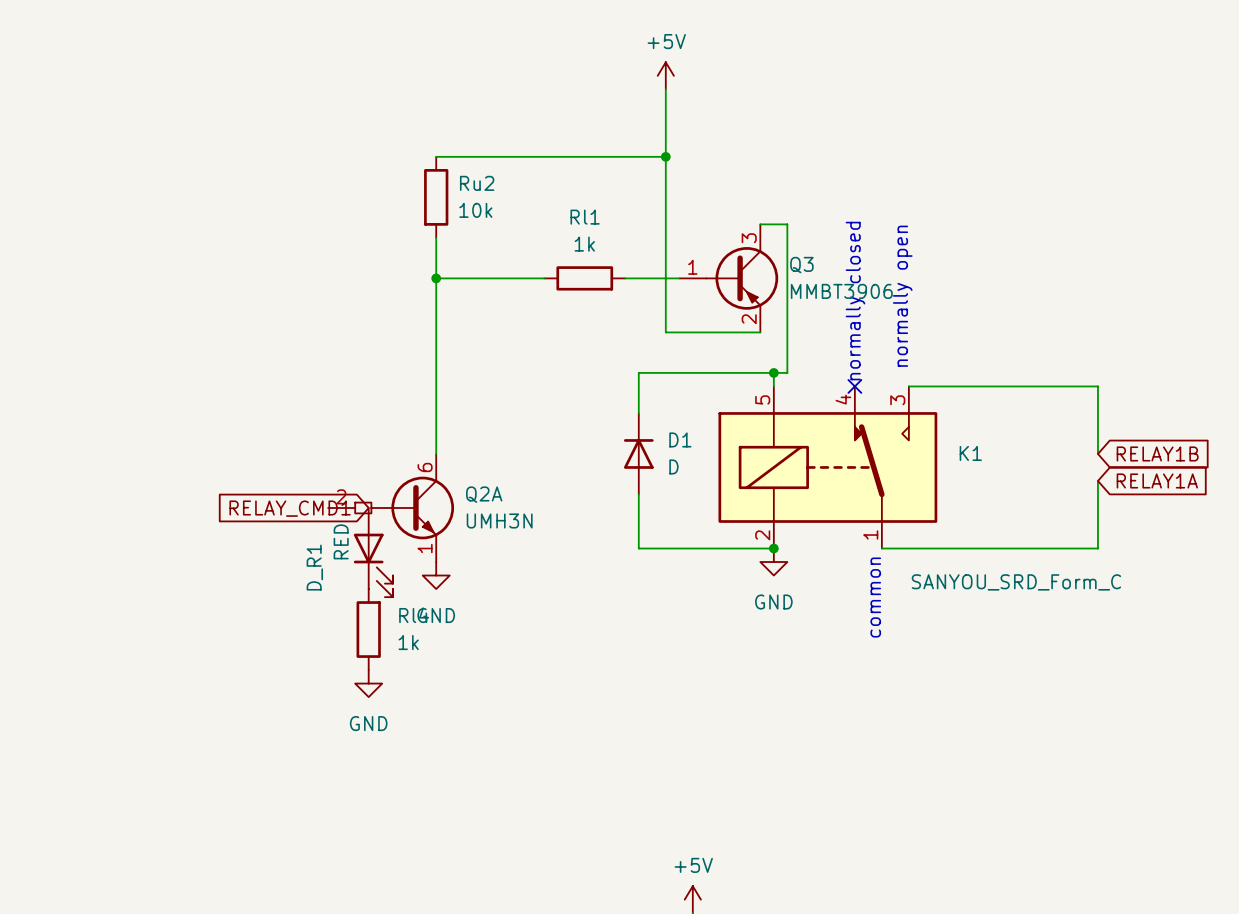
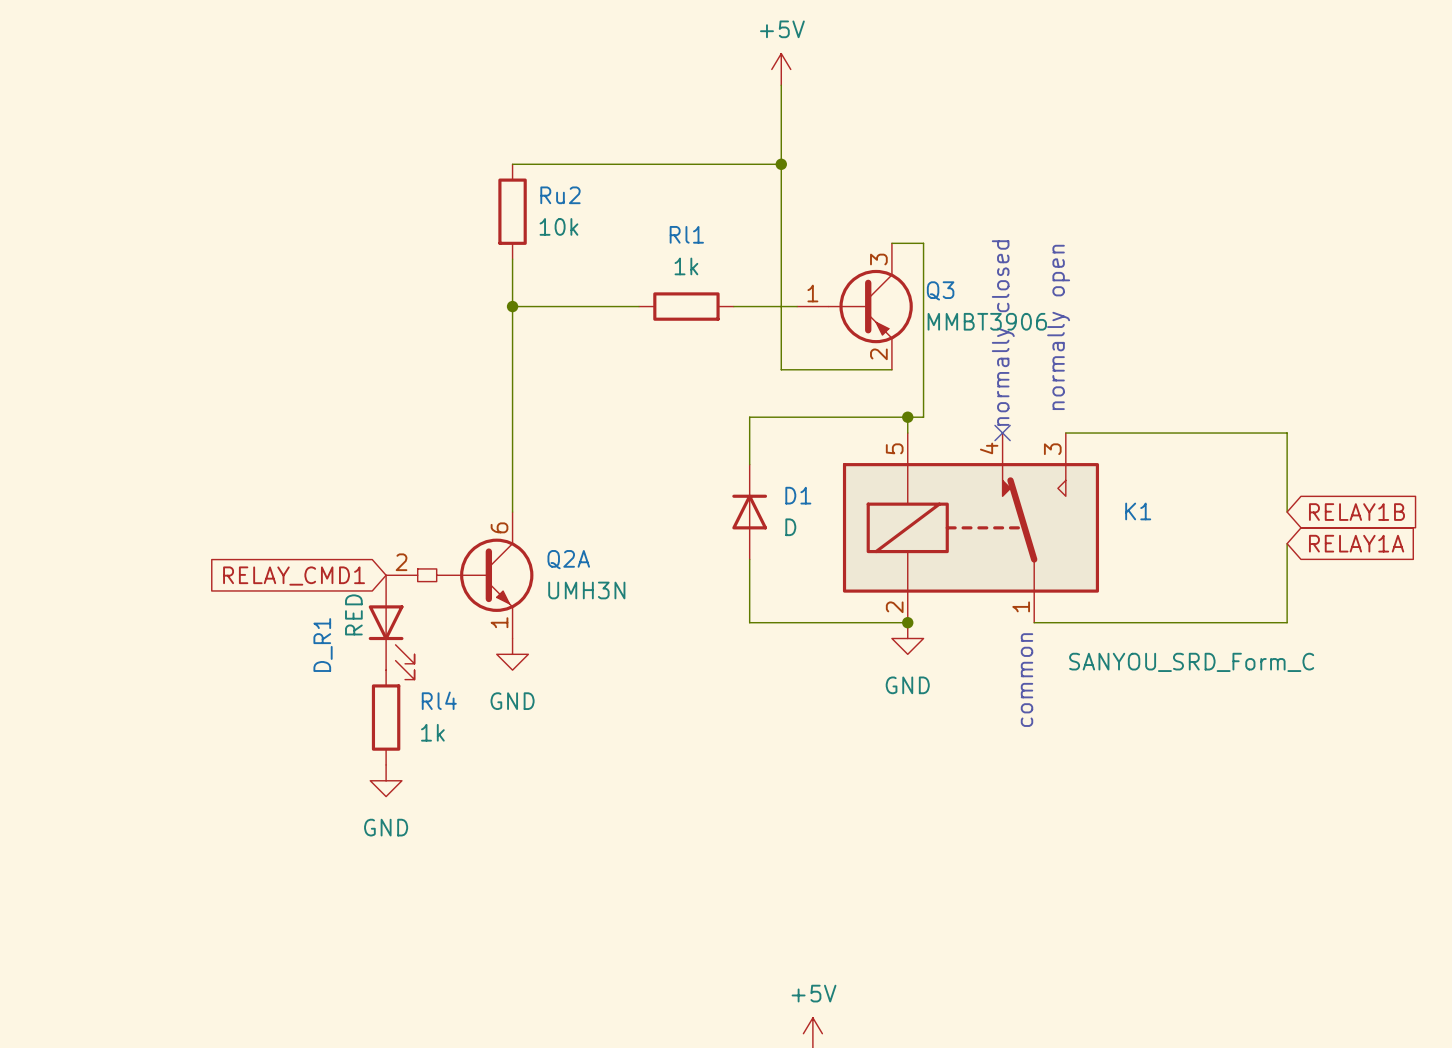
global label position: RELAY_CMD1 (290, 508) -> RELAY_CMD1 (294, 576)
D_R1 position: (373, 552) -> (391, 627)
Rl4 position: (368, 629) -> (386, 717)
power symbol position: GND (368, 683) -> GND (386, 780)

